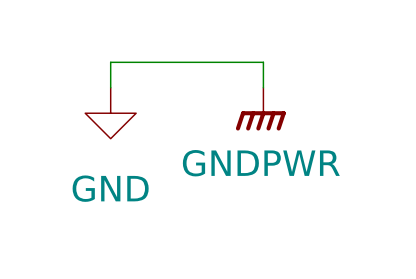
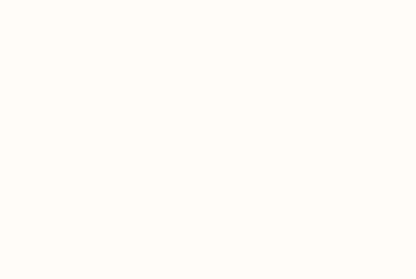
wire: (110, 87) (110, 62) (263, 62) (263, 87) -> none
power symbol: GNDPWR (260, 109) -> none
power symbol: GND (110, 113) -> none

